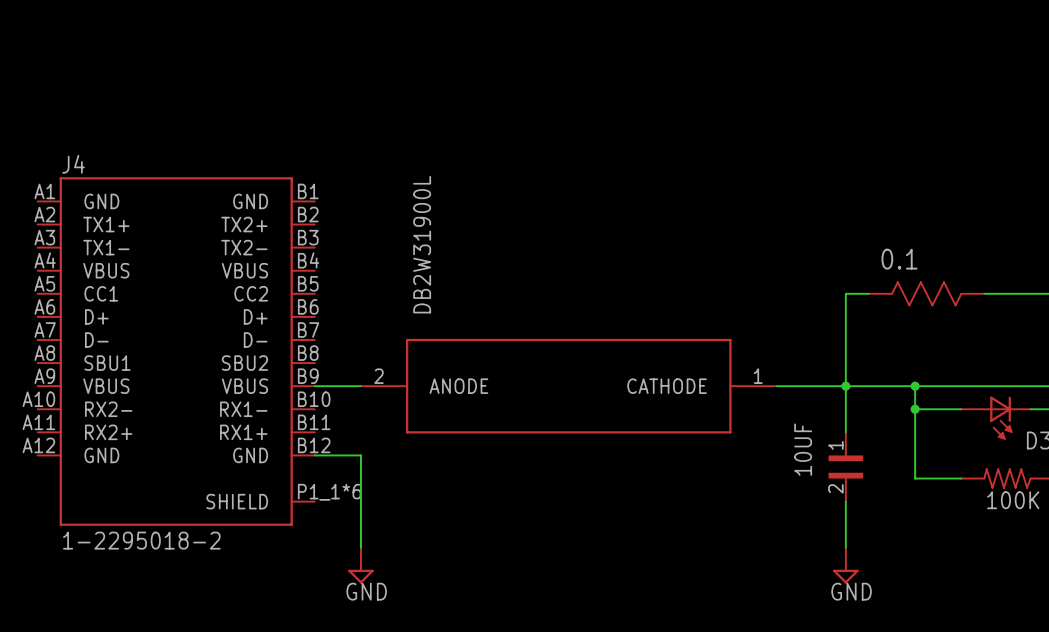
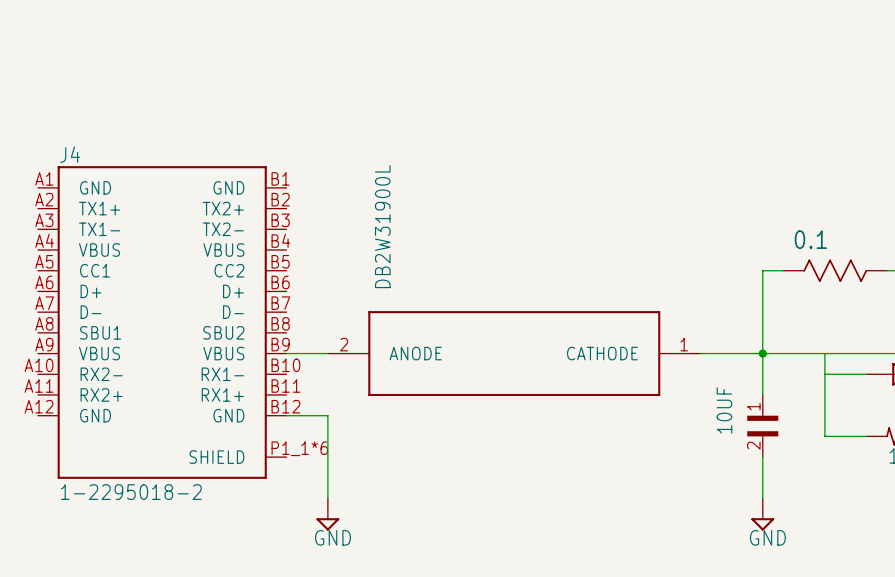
junction: (915, 386) -> none
junction: (915, 409) -> none

